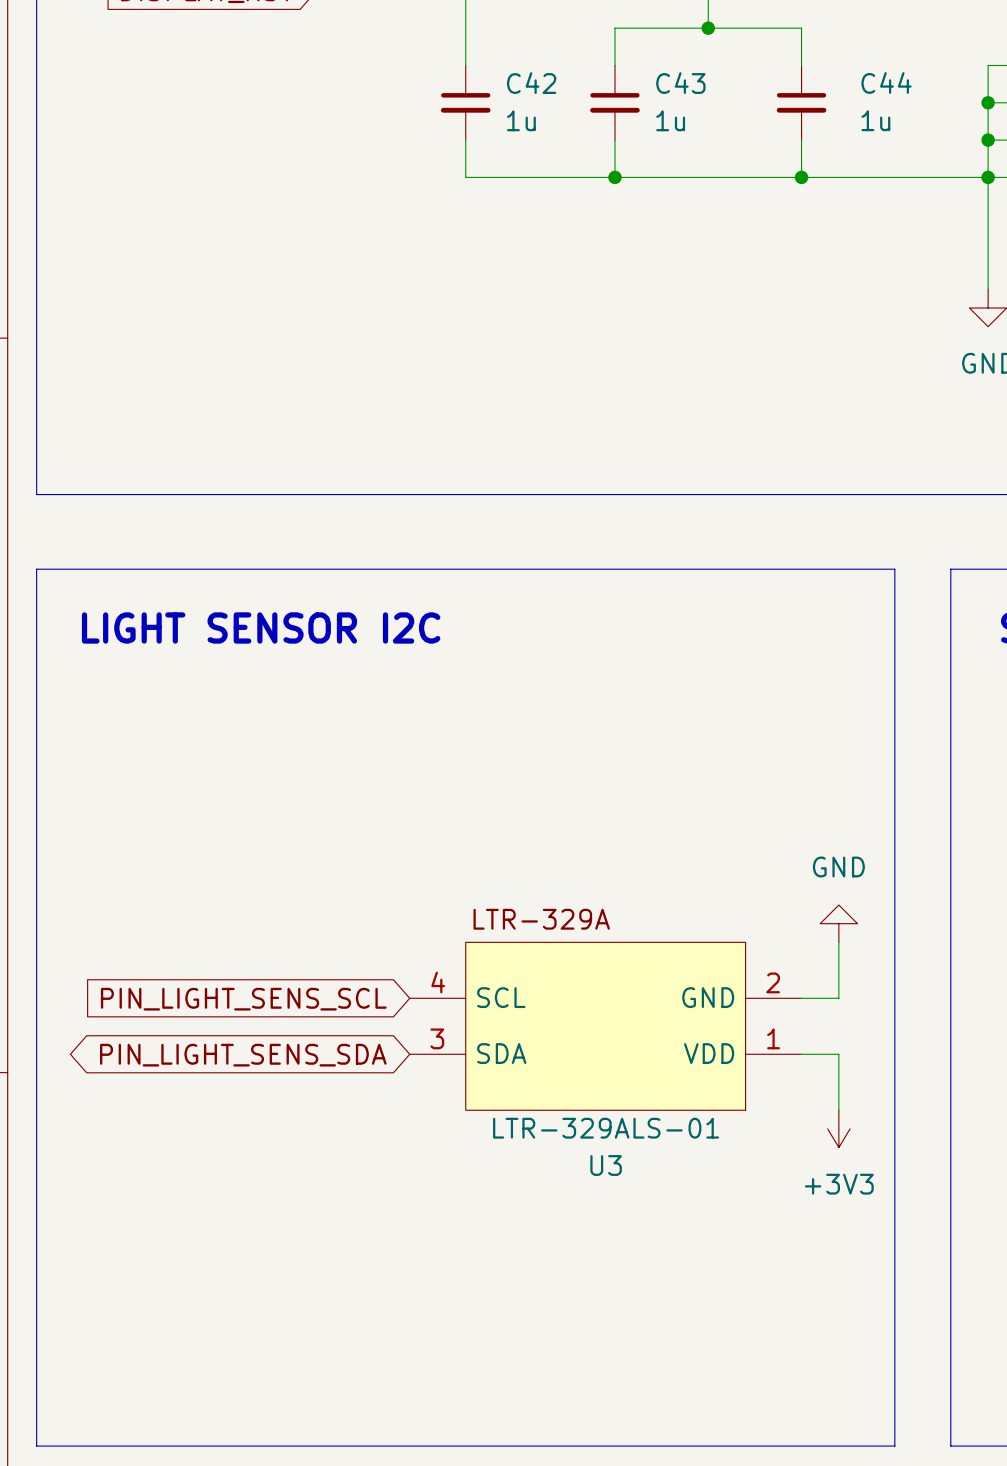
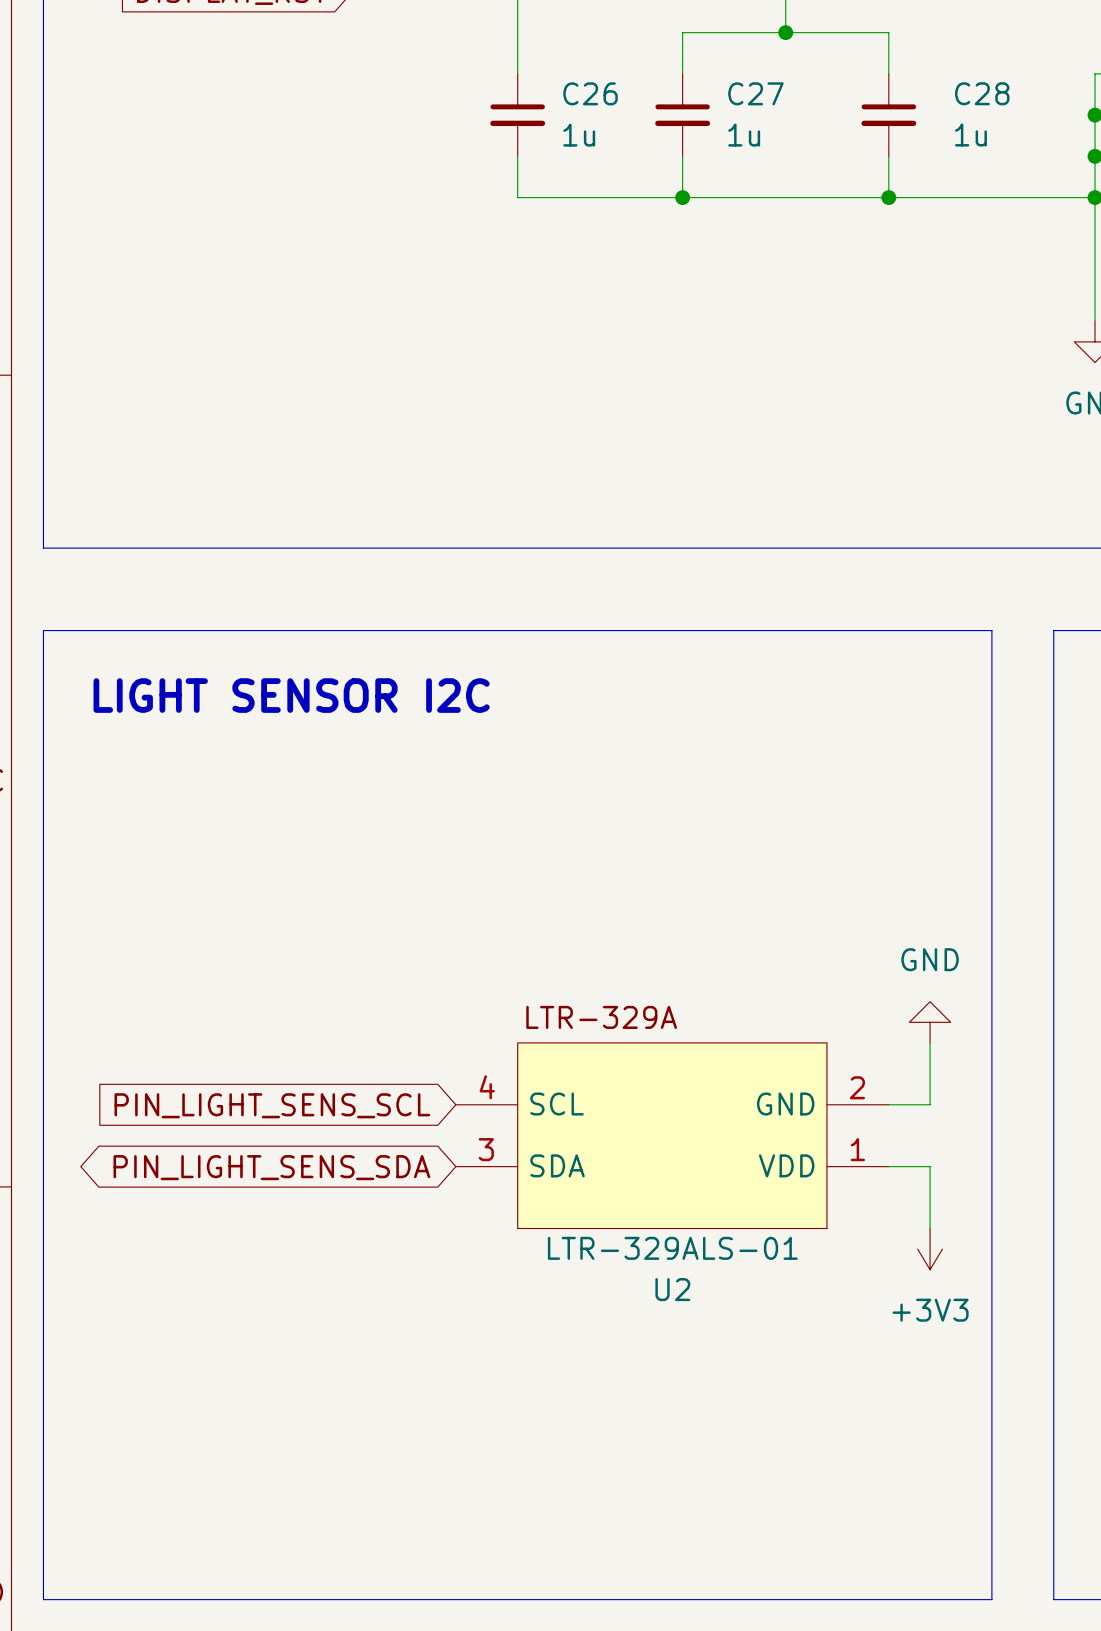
C44 name: C44 (886, 82) -> C28 (982, 93)
C42 name: C42 (531, 83) -> C26 (590, 93)
C43 name: C43 (680, 83) -> C27 (755, 93)
U3 name: U3 (606, 1165) -> U2 (672, 1289)

